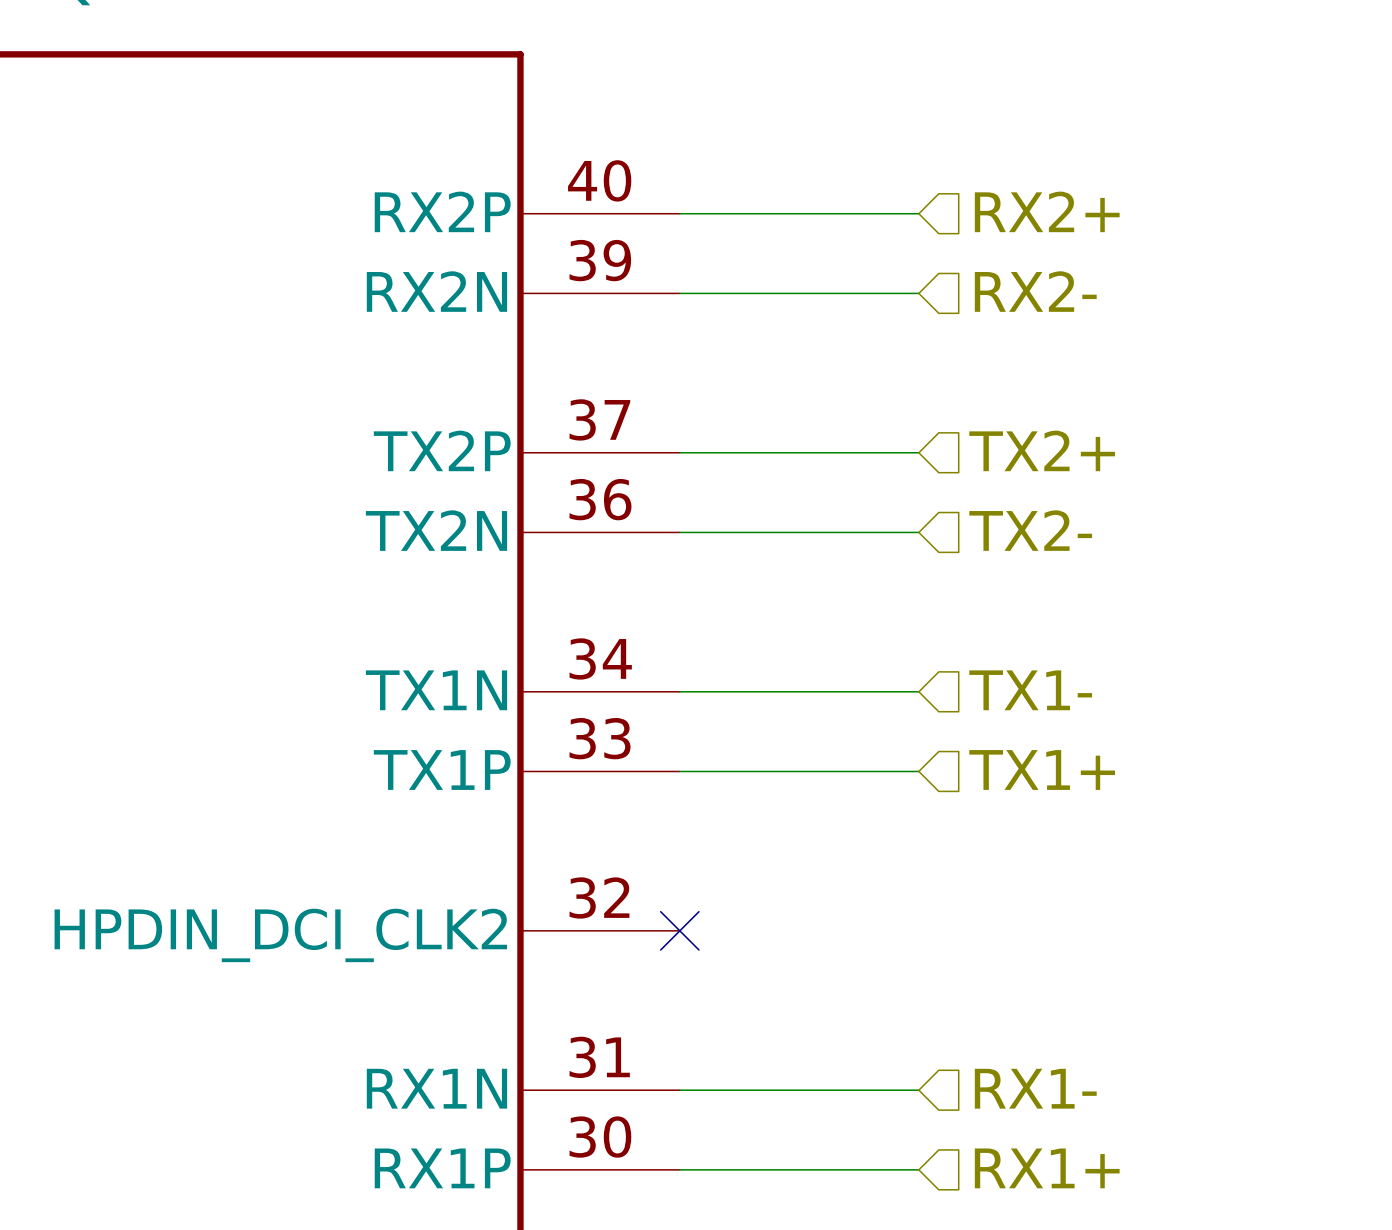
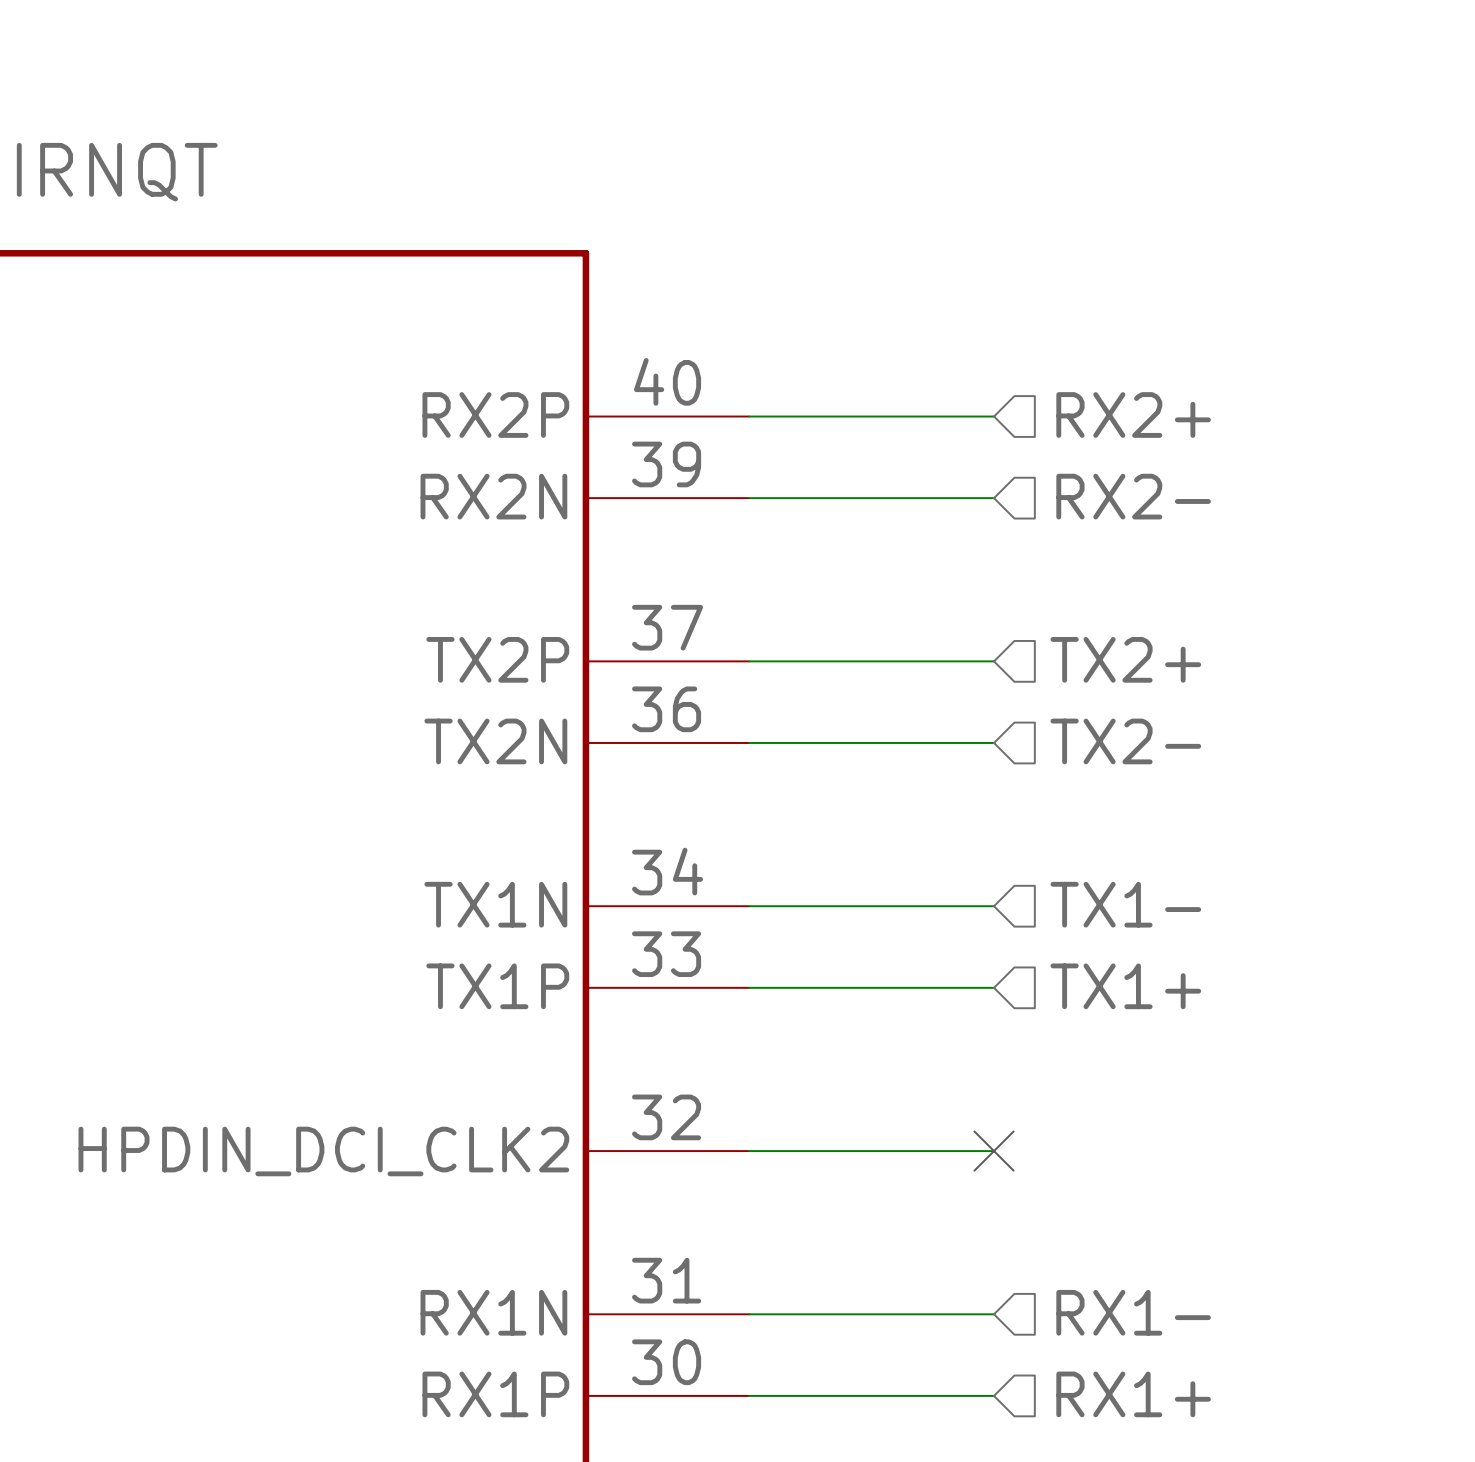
wire: none -> (749, 1151) (994, 1151)
no-connect mark: (679, 930) -> none
no-connect mark: none -> (994, 1151)

